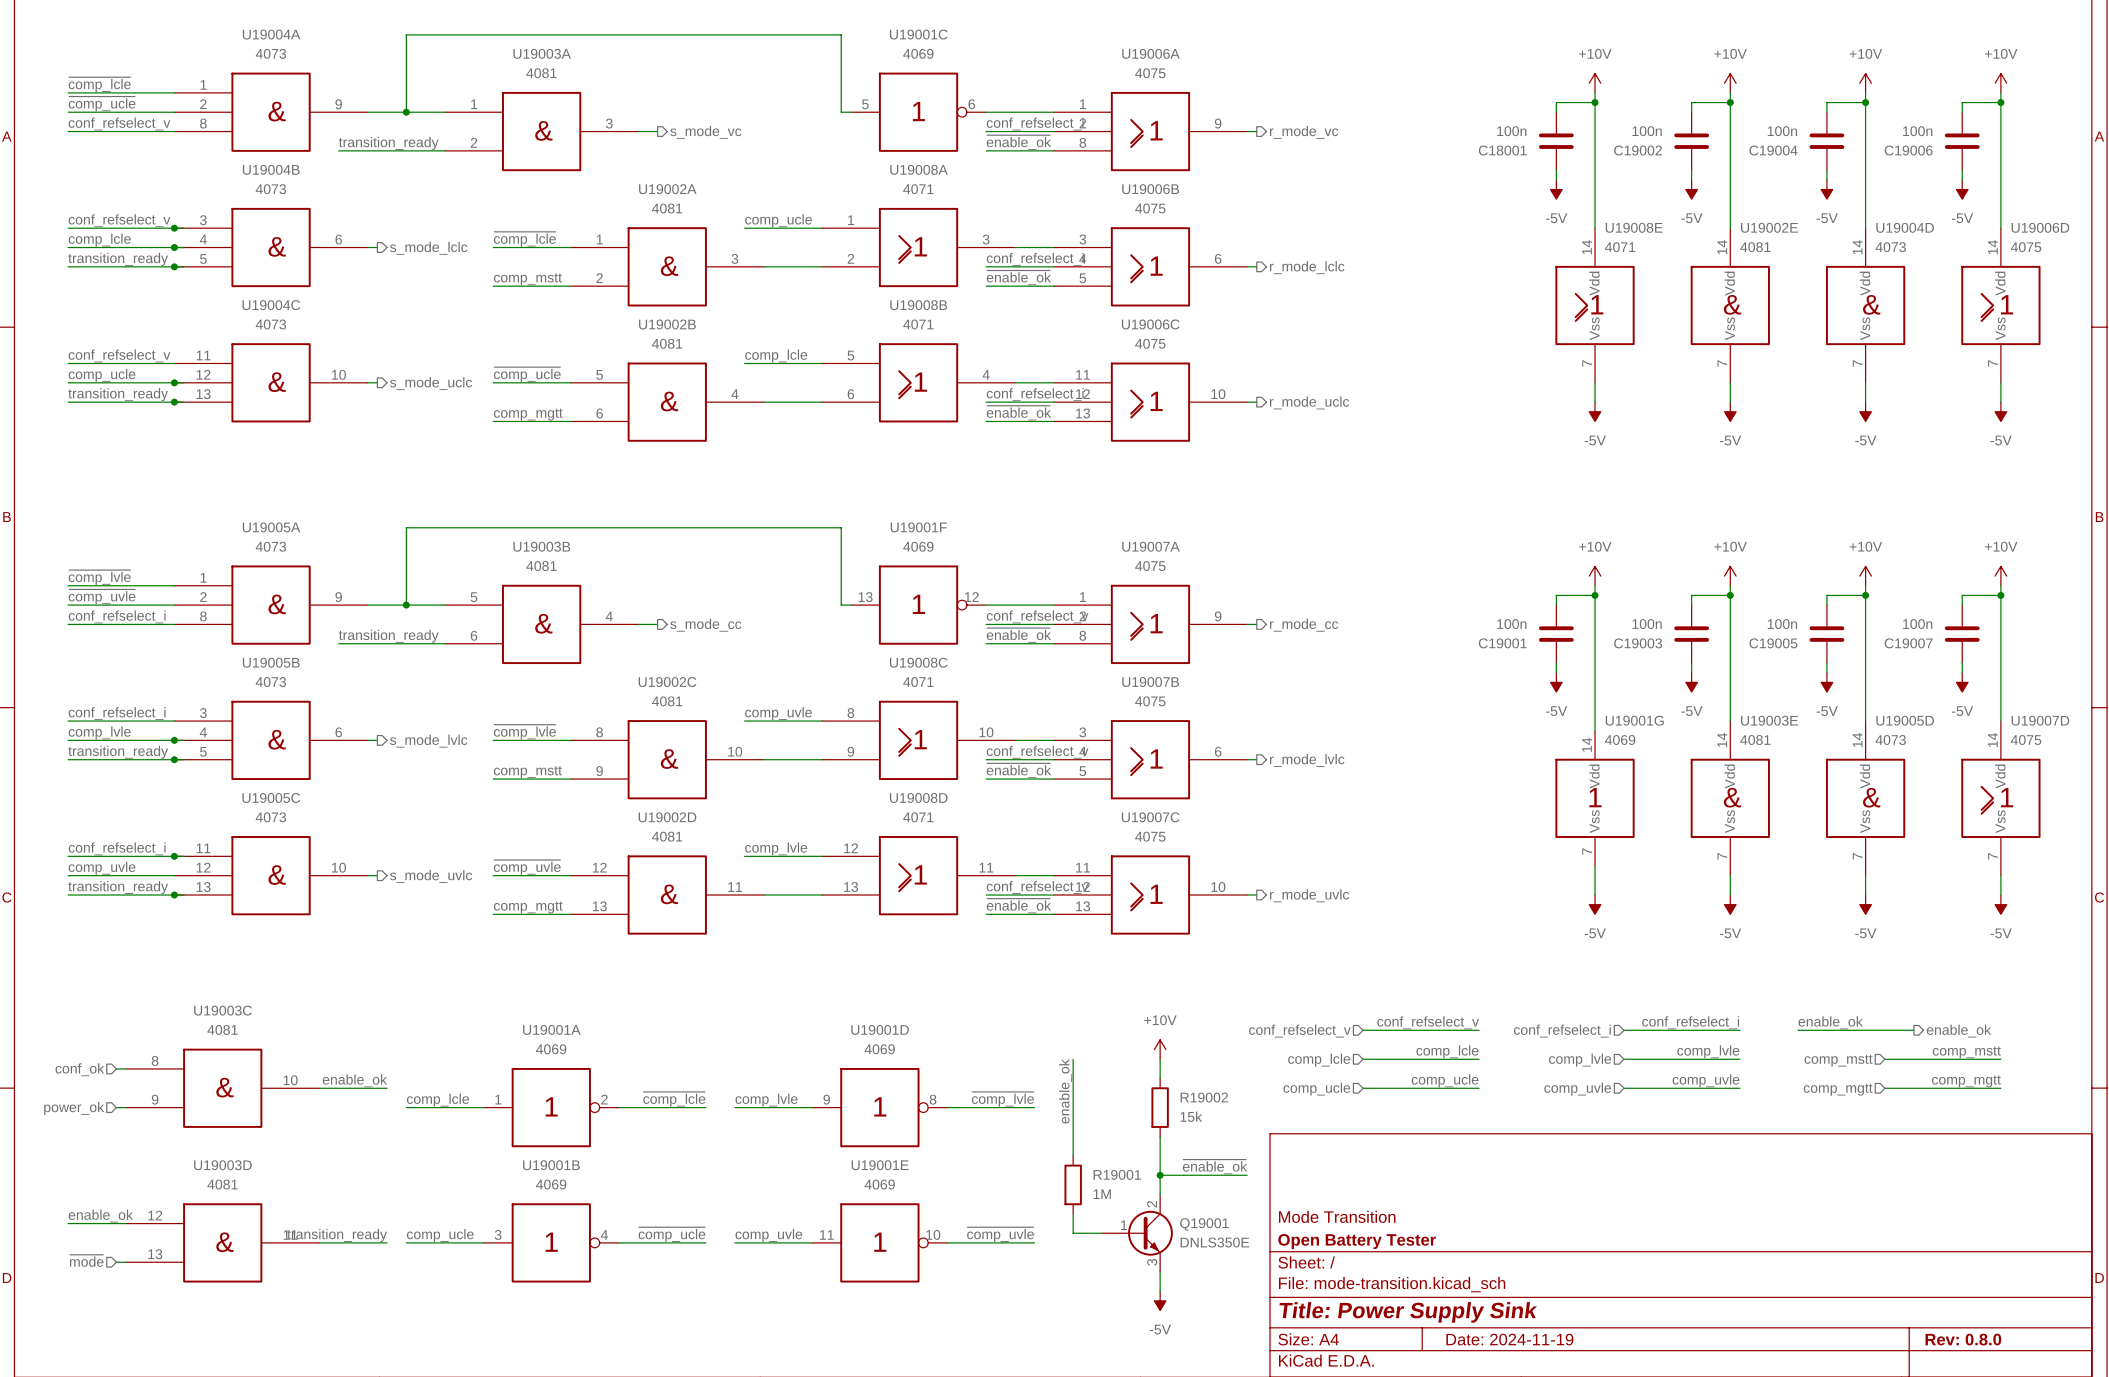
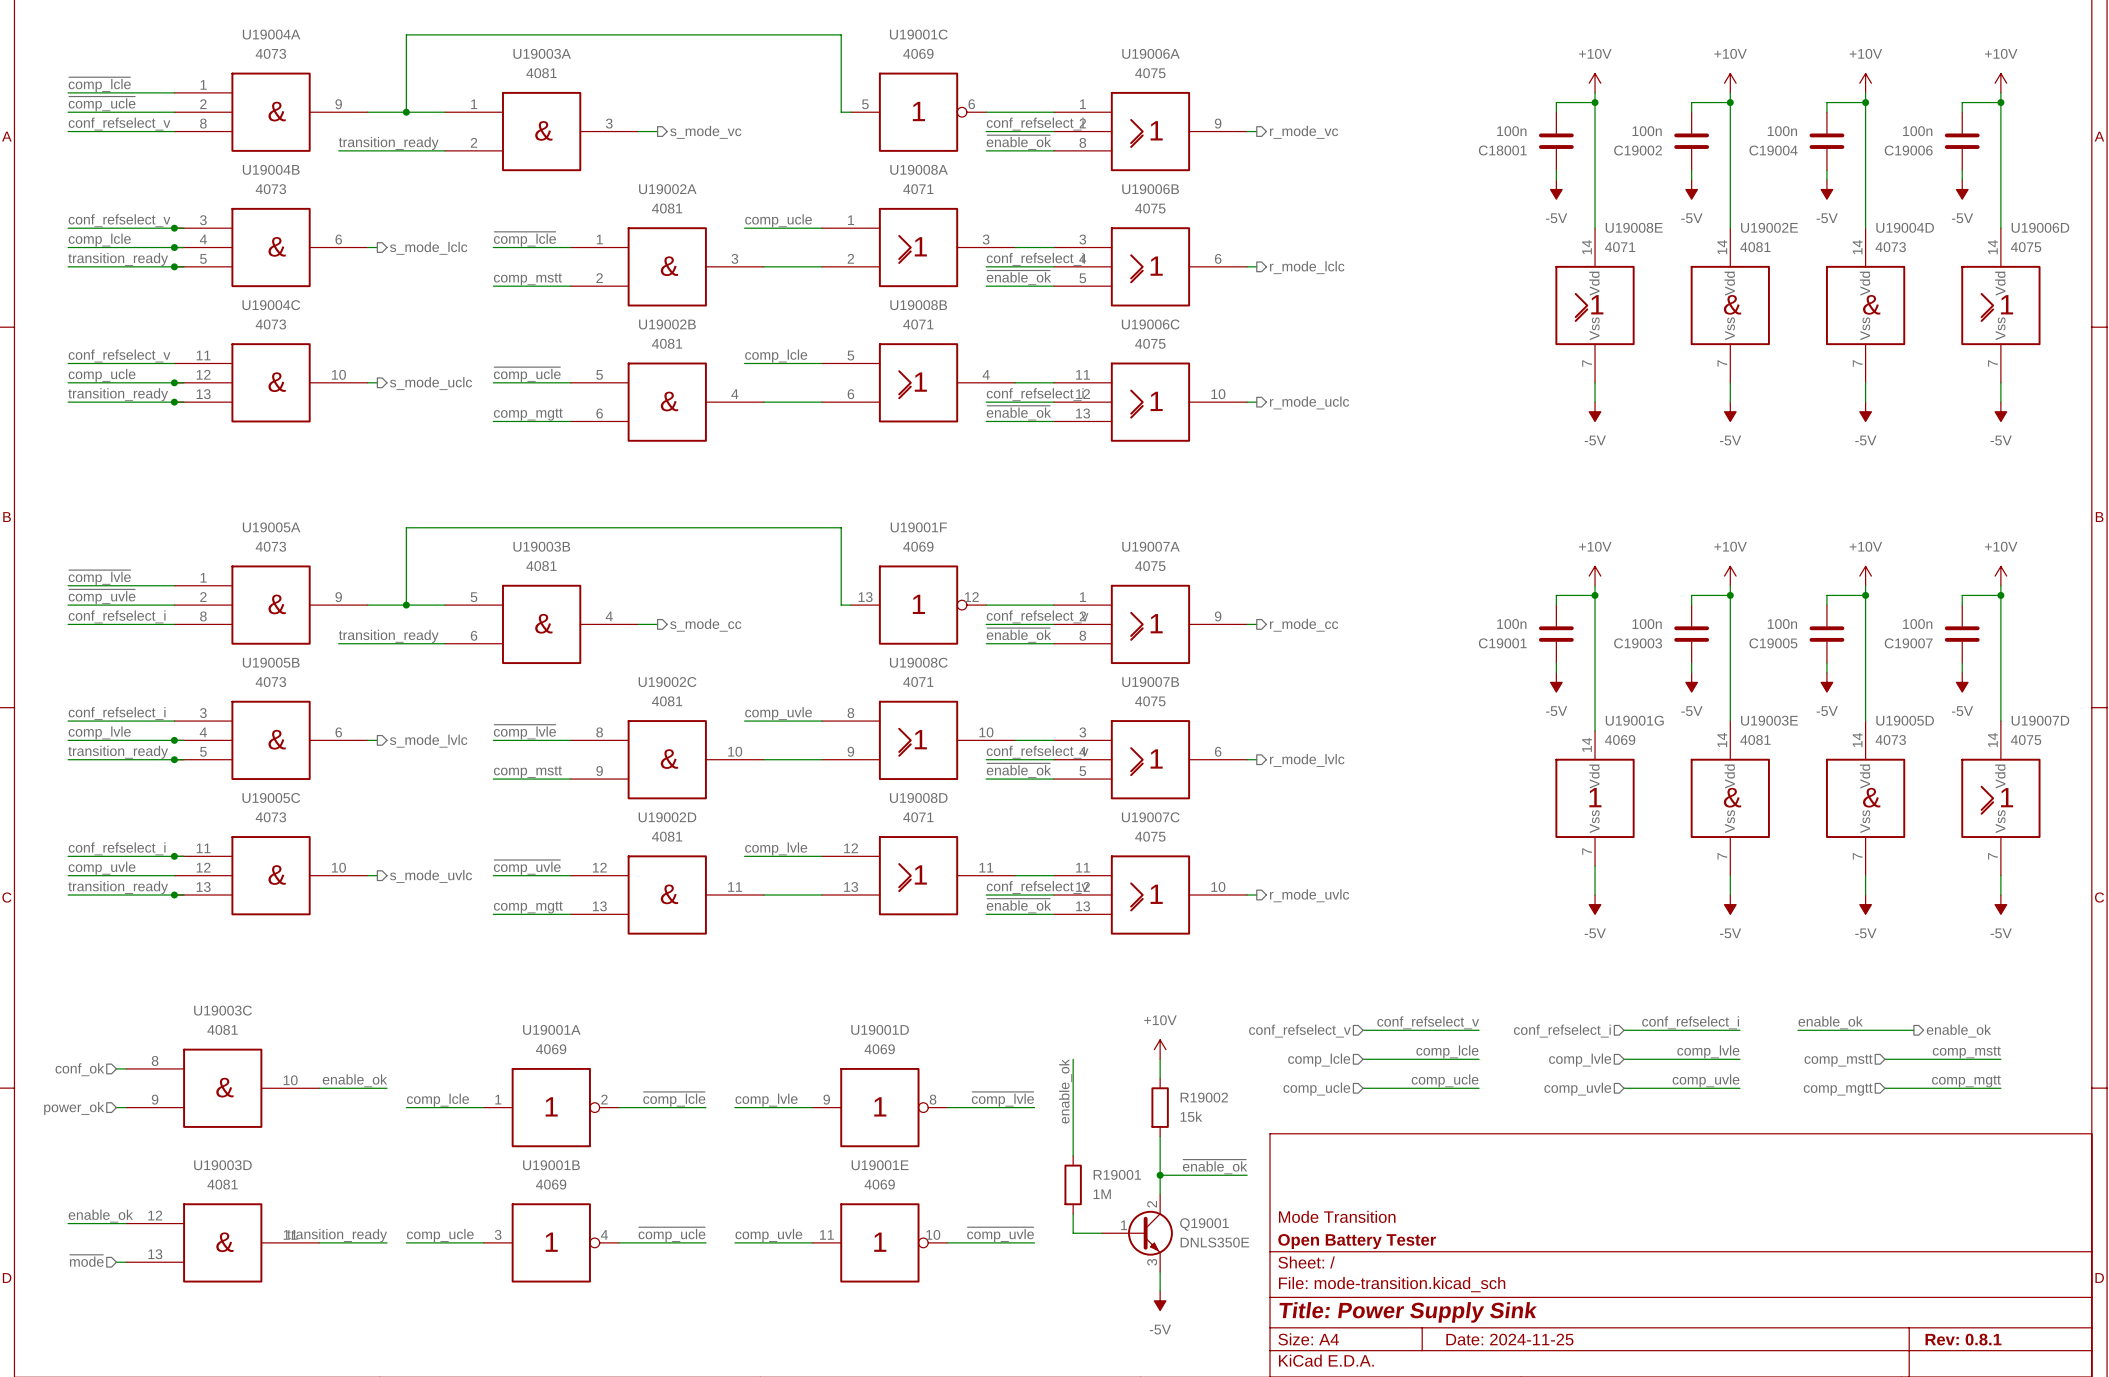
title block: Date: 2024-11-19 (1509, 1339) -> Date: 2024-11-25 (1509, 1339)
title block: Rev: 0.8.0 (1963, 1339) -> Rev: 0.8.1 (1963, 1339)

